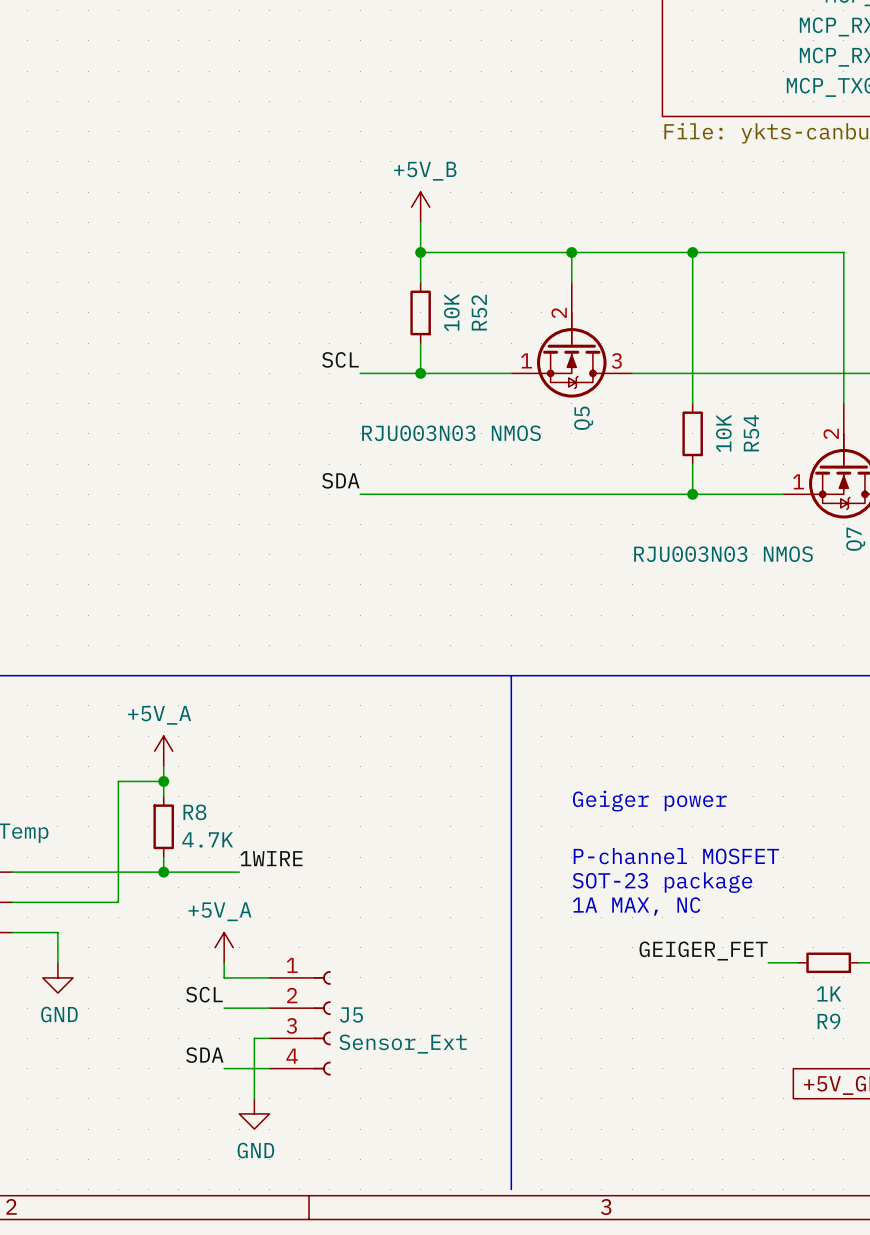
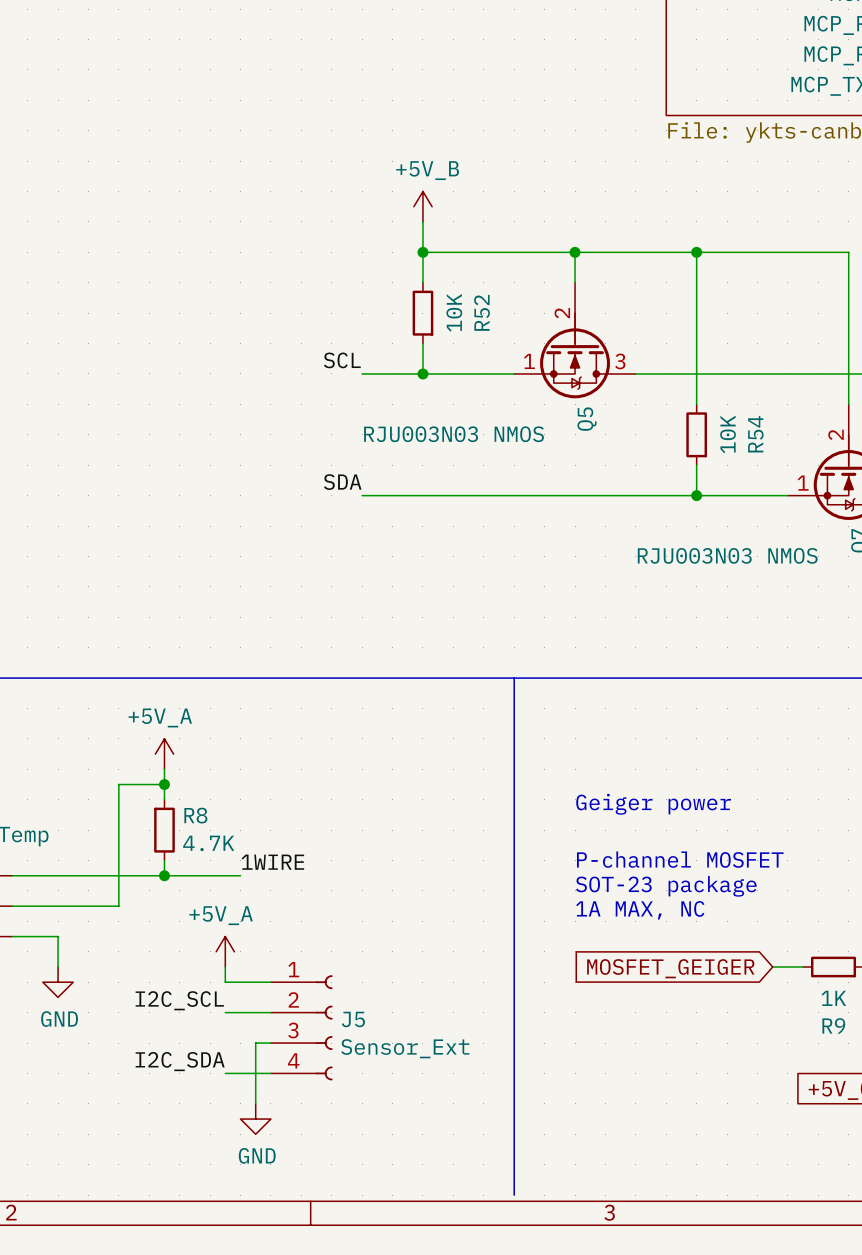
label: GEIGER_FET (703, 951) -> none
global label: none -> MOSFET_GEIGER (670, 968)
label: SCL (204, 994) -> I2C_SCL (179, 1000)
label: SDA (204, 1055) -> I2C_SDA (180, 1061)

